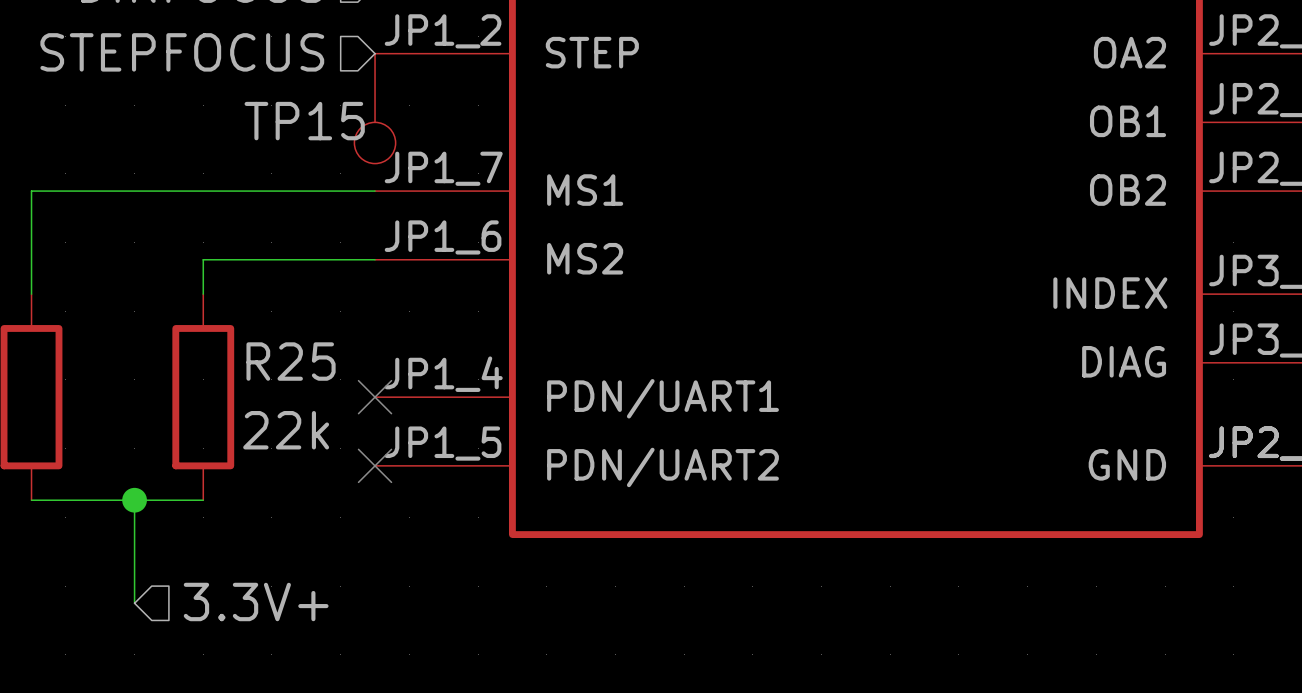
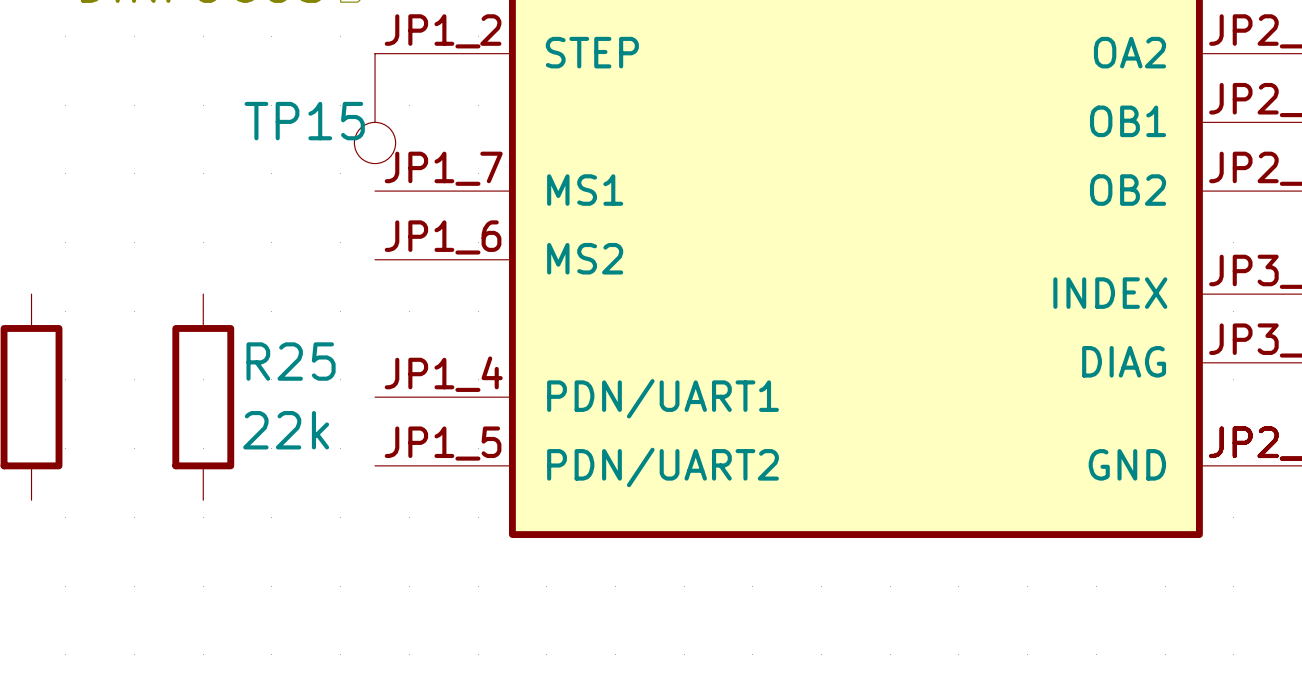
hierarchical label: STEPFOCUS (182, 52) -> none
wire: (375, 191) (31, 191) (31, 294) -> none
wire: (375, 259) (203, 259) (203, 294) -> none
no-connect mark: (375, 397) -> none
no-connect mark: (375, 465) -> none
wire: (31, 500) (203, 500) -> none
wire: (134, 500) (134, 603) -> none
junction: (134, 500) -> none
hierarchical label: 3.3V+ (256, 601) -> none

